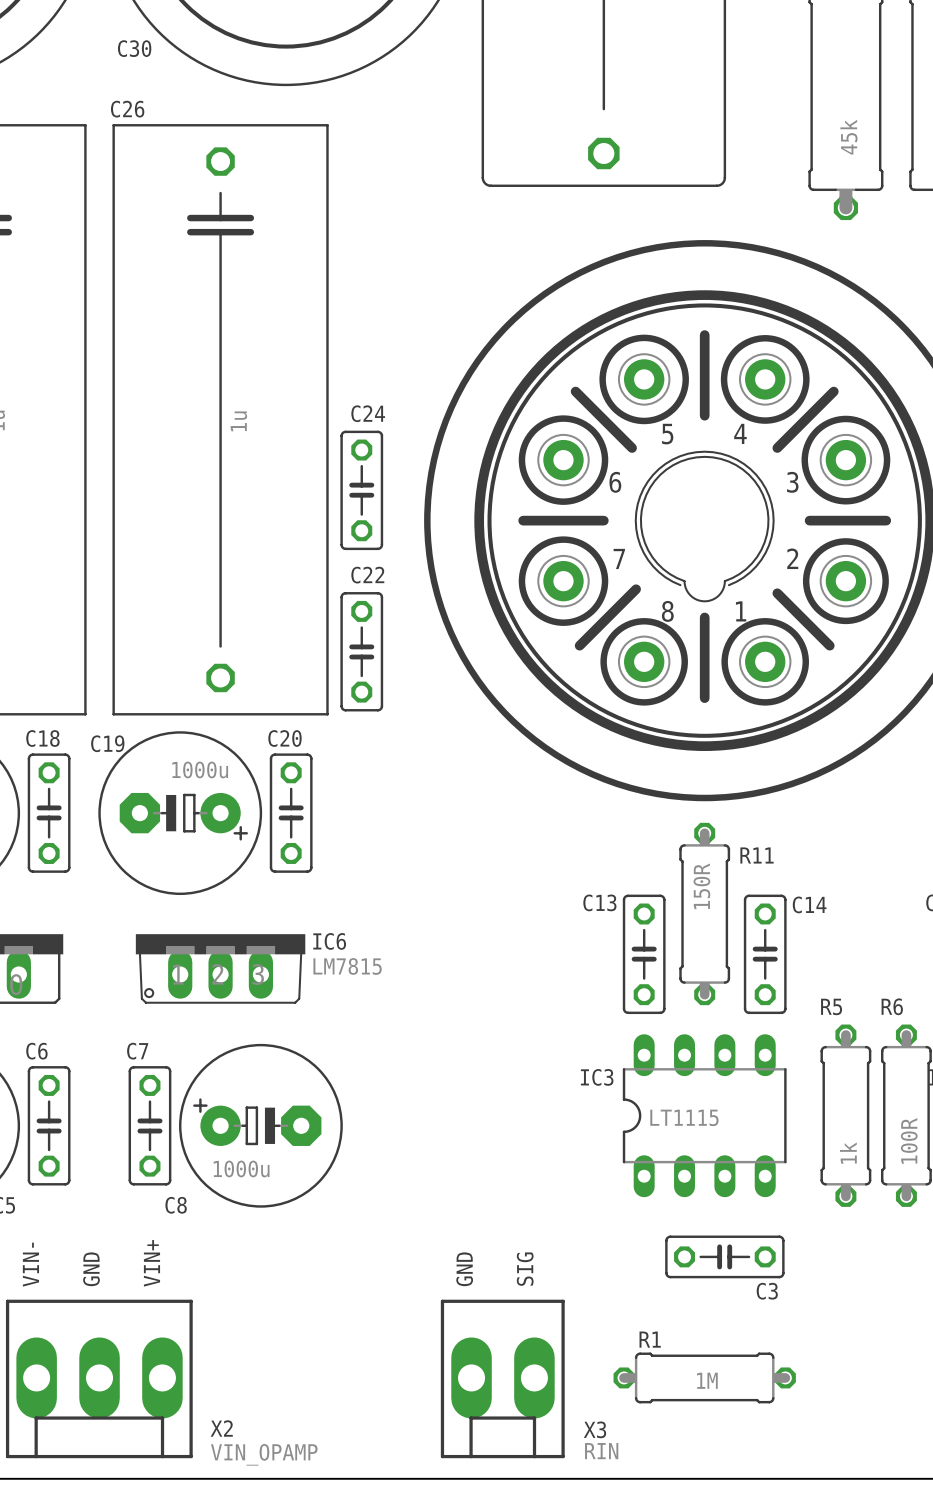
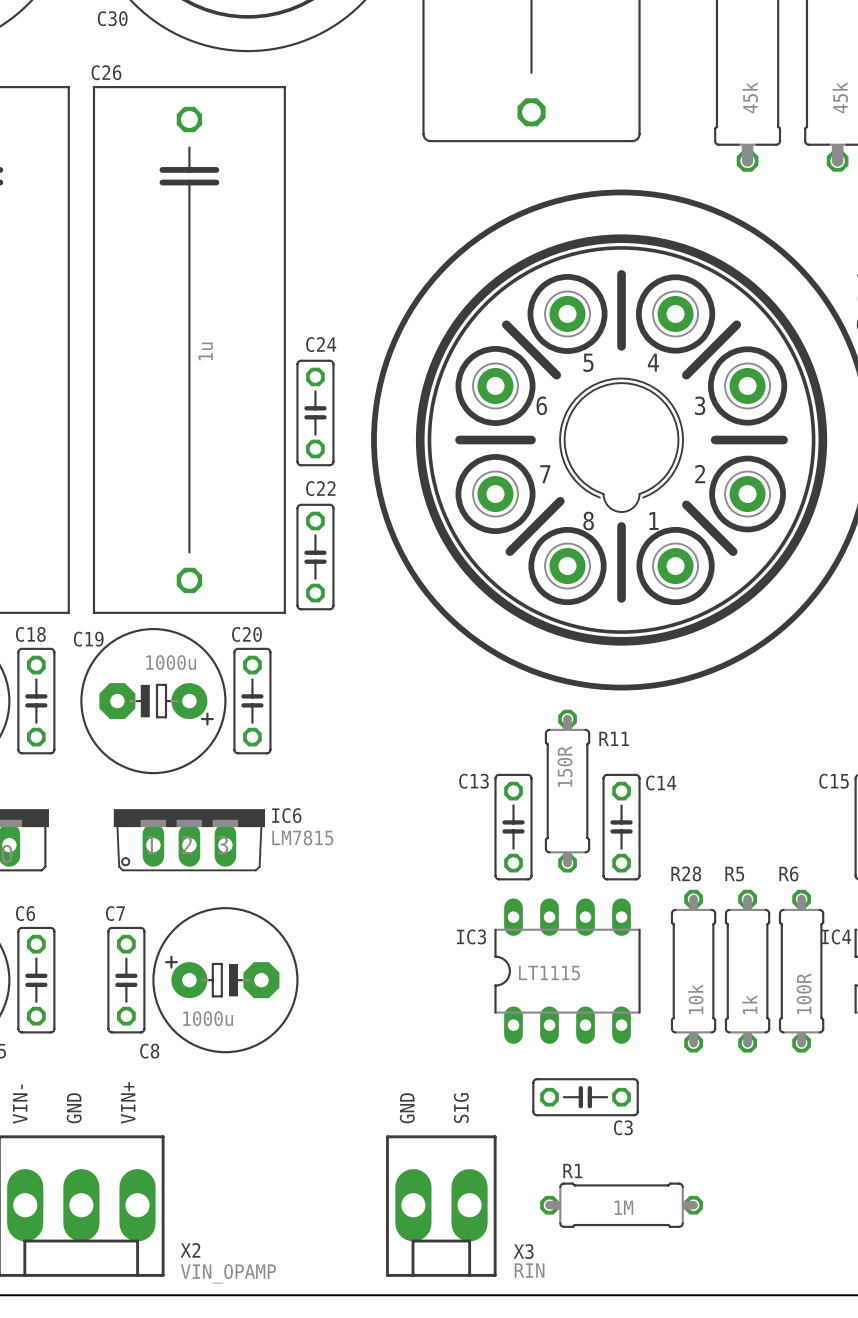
R11 position: (704, 913) -> (567, 791)
C13 position: (644, 954) -> (513, 827)
C14 position: (765, 954) -> (621, 827)
IC3 position: (704, 1115) -> (567, 971)
R28: none -> 10k (693, 971)
C3 position: (724, 1256) -> (585, 1097)

